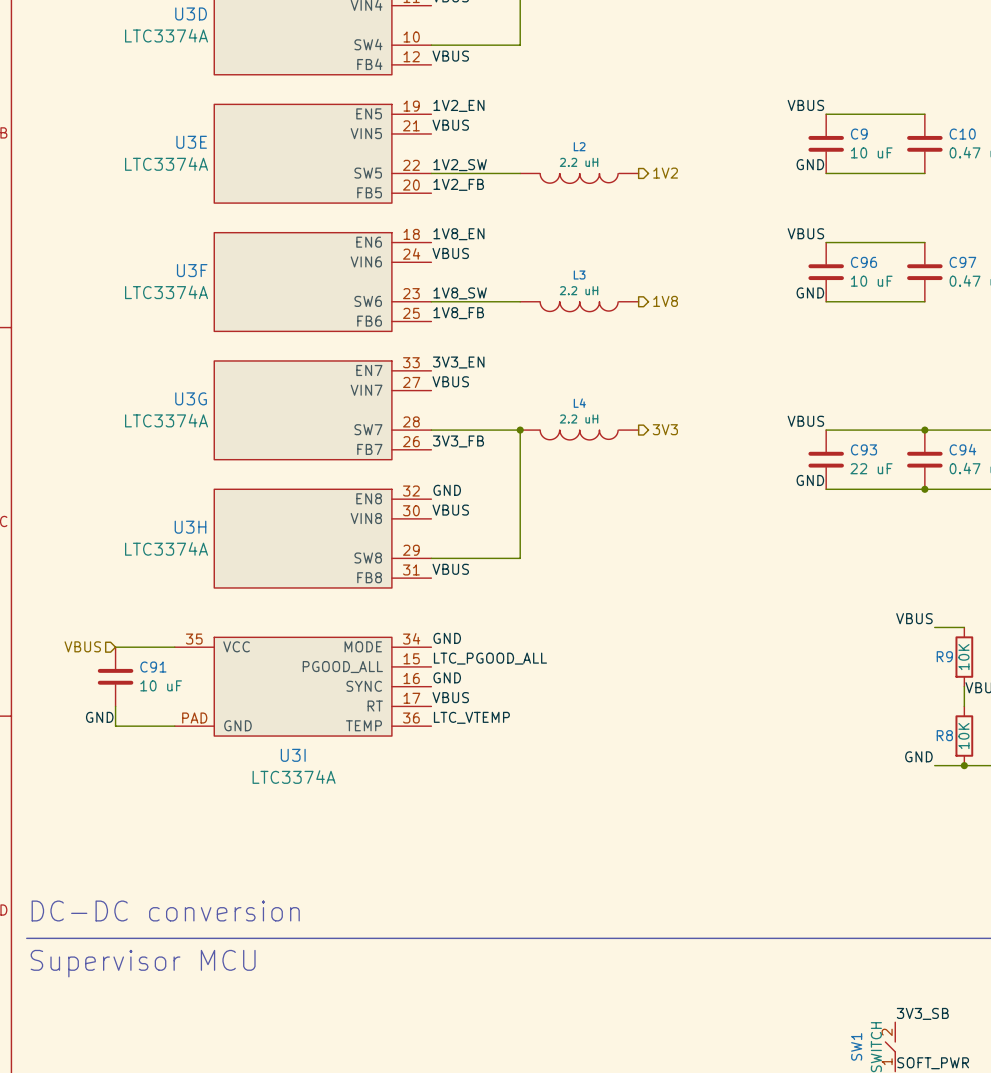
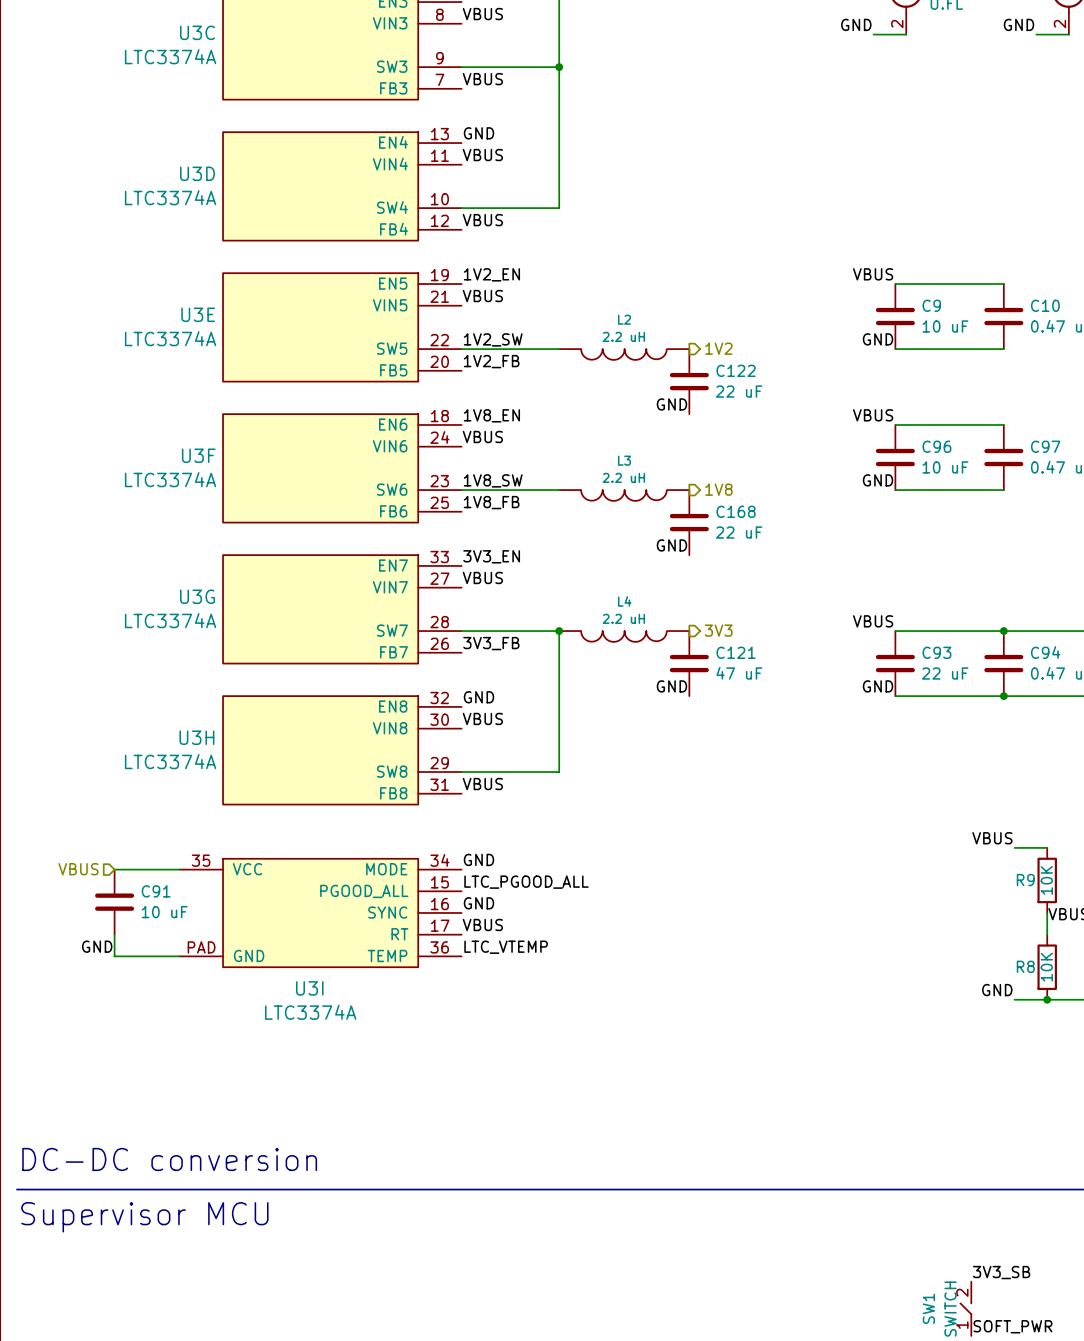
C122: none -> 22 uF (689, 381)
label: none -> GND (671, 404)
C168: none -> 22 uF (689, 522)
label: none -> GND (671, 545)
C121: none -> 47 uF (689, 663)
label: none -> GND (671, 686)

